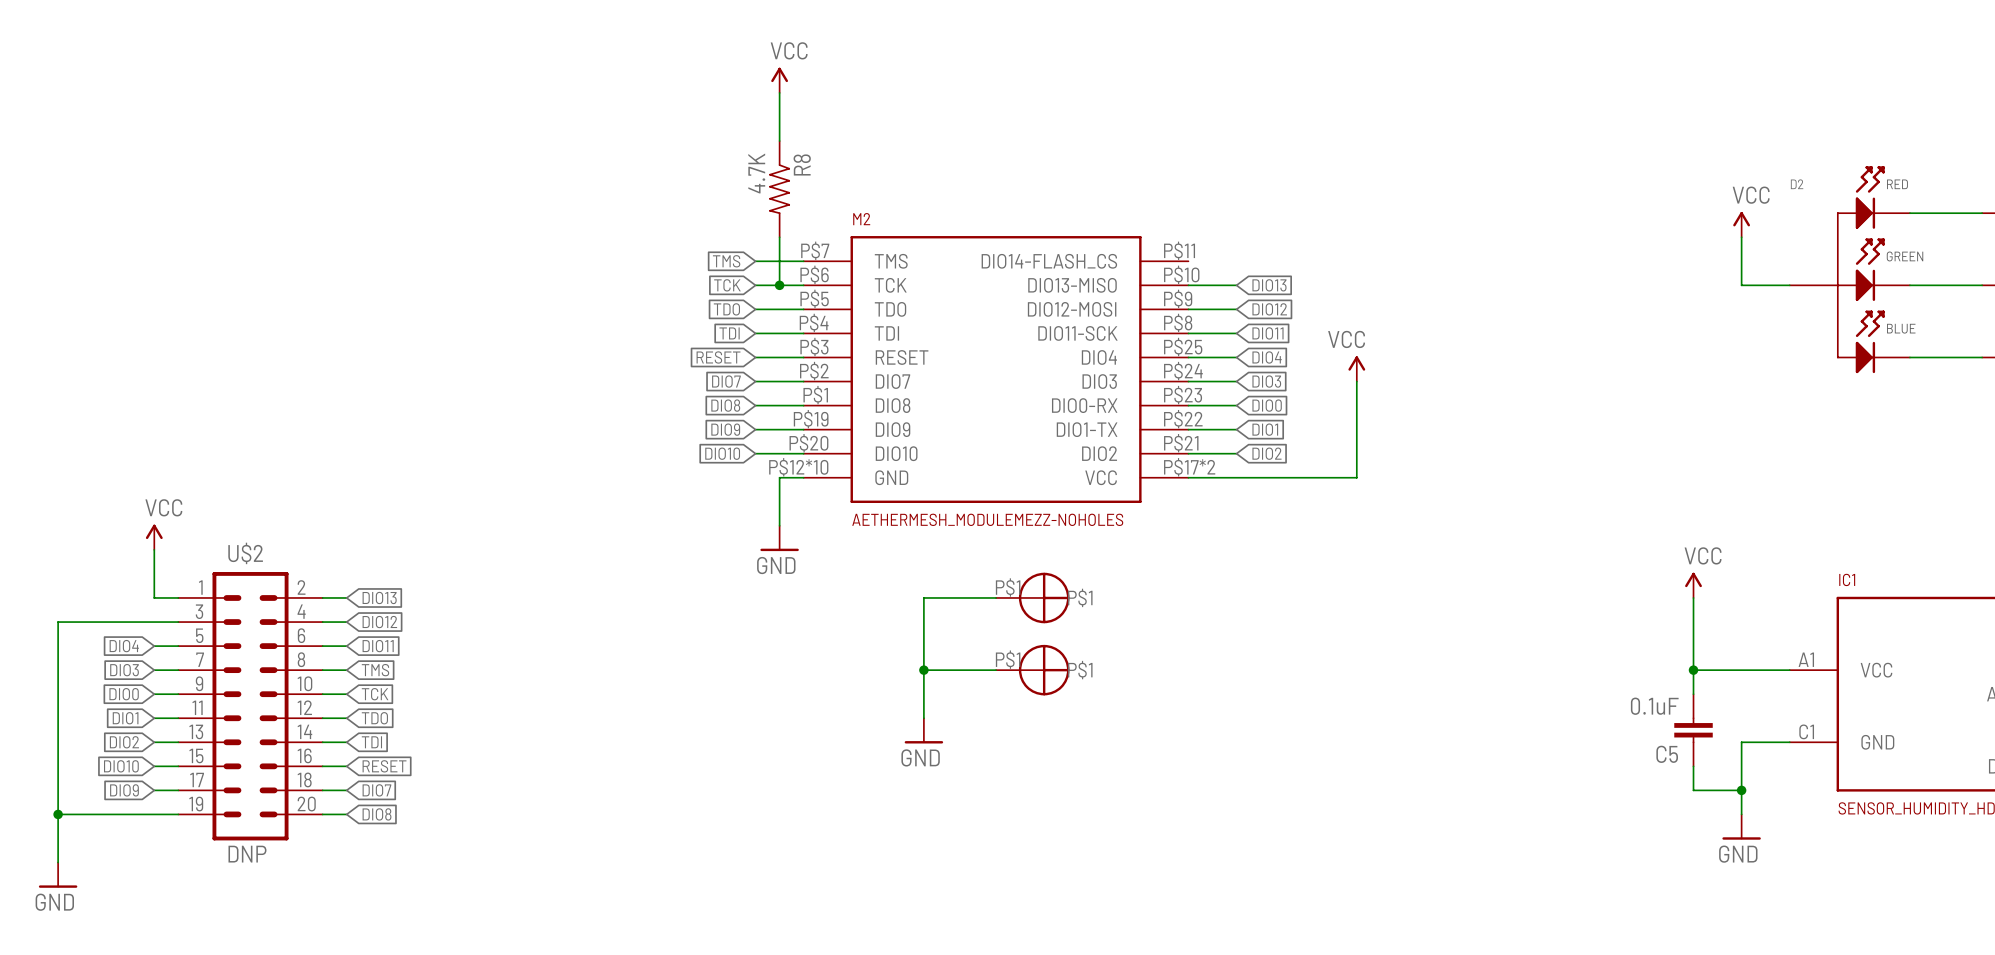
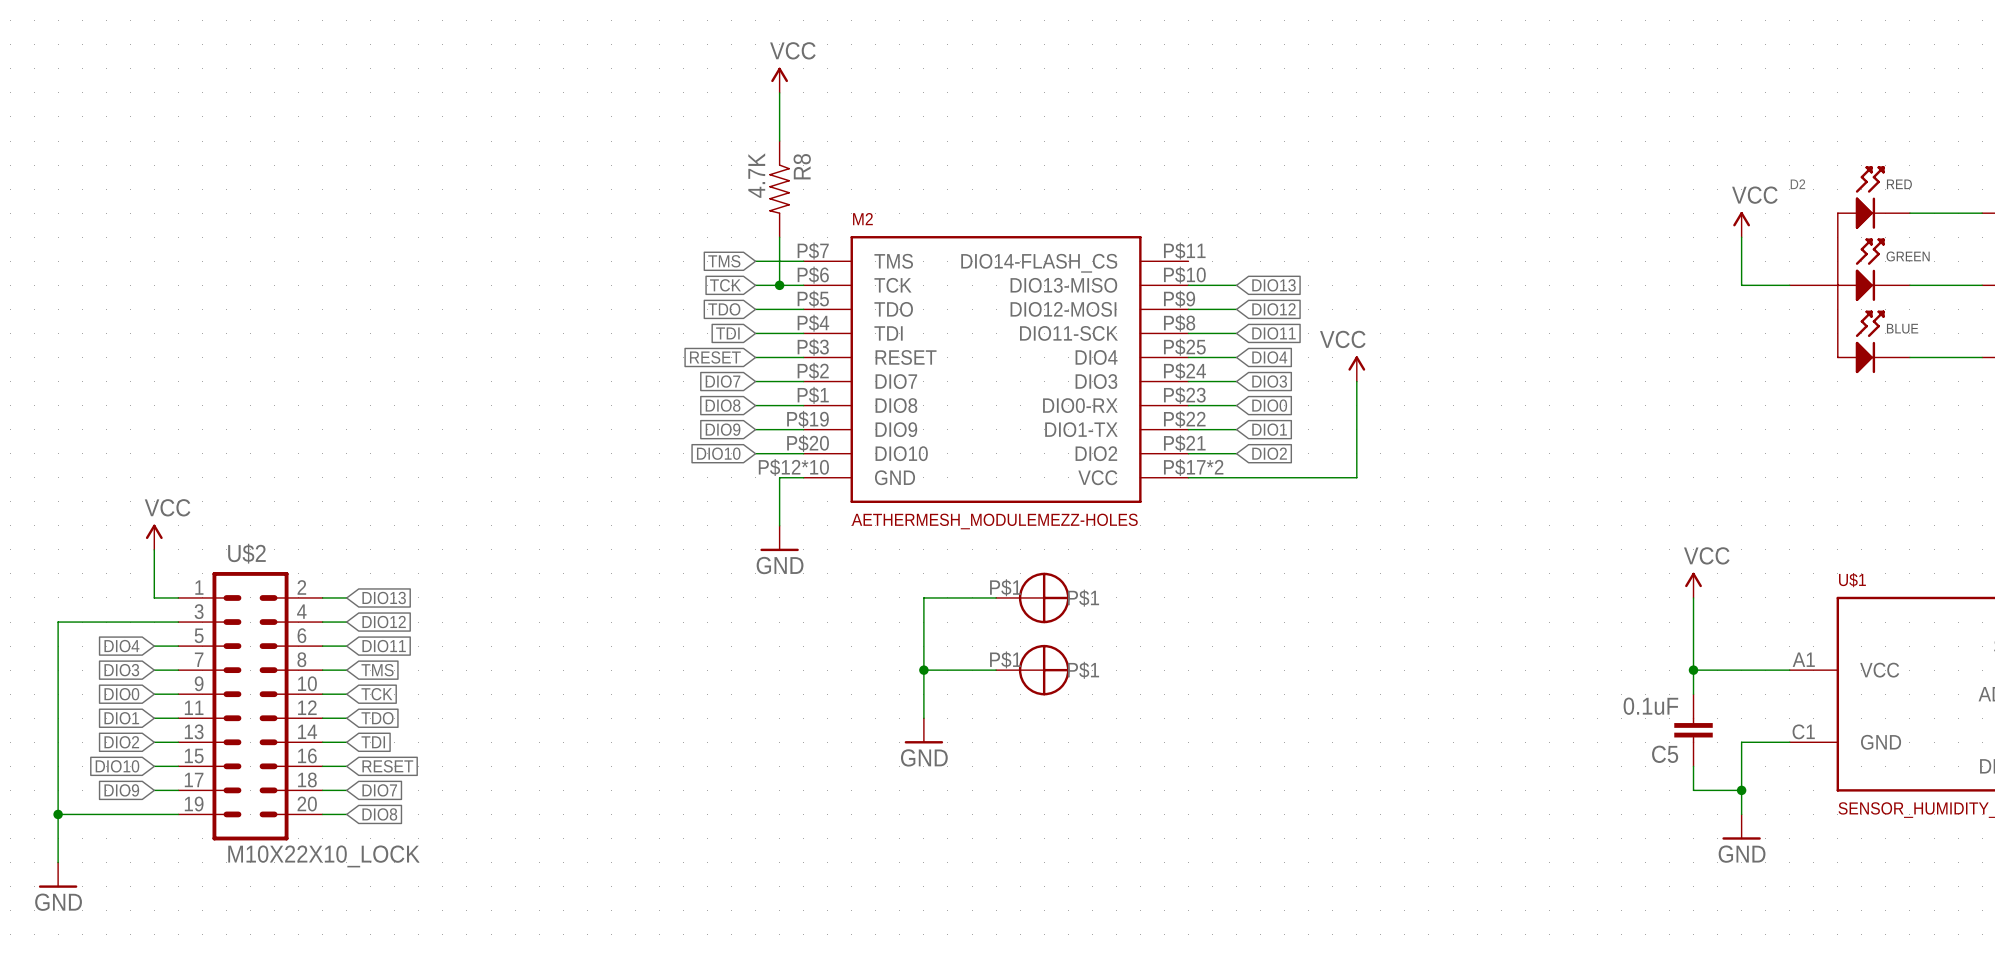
M2 value: AETHERMESH_MODULEMEZZ-NOHOLES (987, 519) -> AETHERMESH_MODULEMEZZ-HOLES (994, 521)
IC1 name: IC1 (1847, 579) -> U$1 (1852, 580)
U$2 value: DNP (247, 854) -> M10X22X10_LOCK (323, 856)

